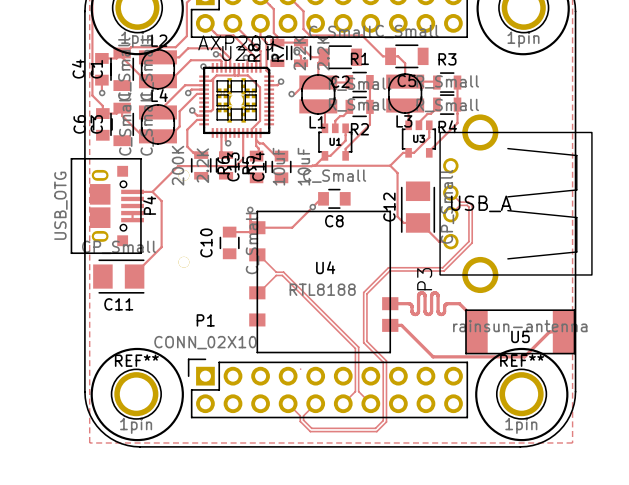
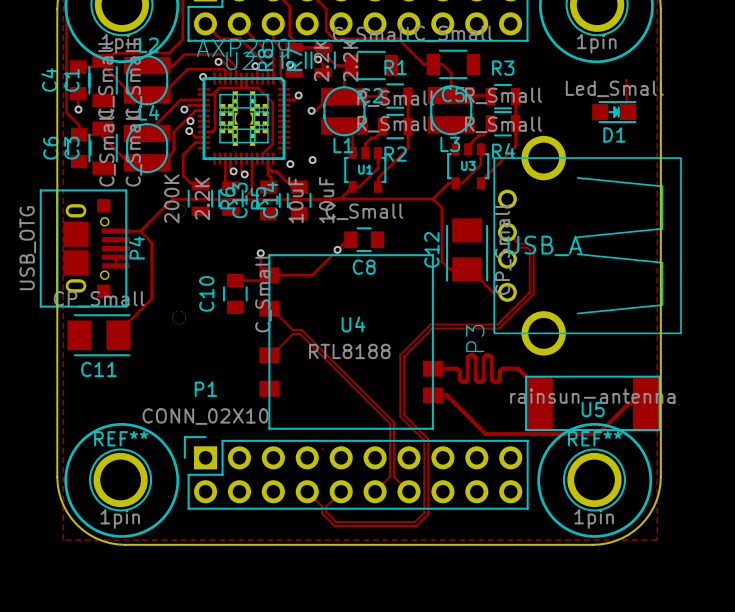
track: none -> (626, 79) (626, 110) (628, 112)
D1: none -> Led_Small (614, 112)
via: none -> (190, 121)
track: none -> (241, 158) (241, 170) (244, 174)
via: none -> (312, 160)
via: none -> (290, 164)
via: none -> (244, 174)

